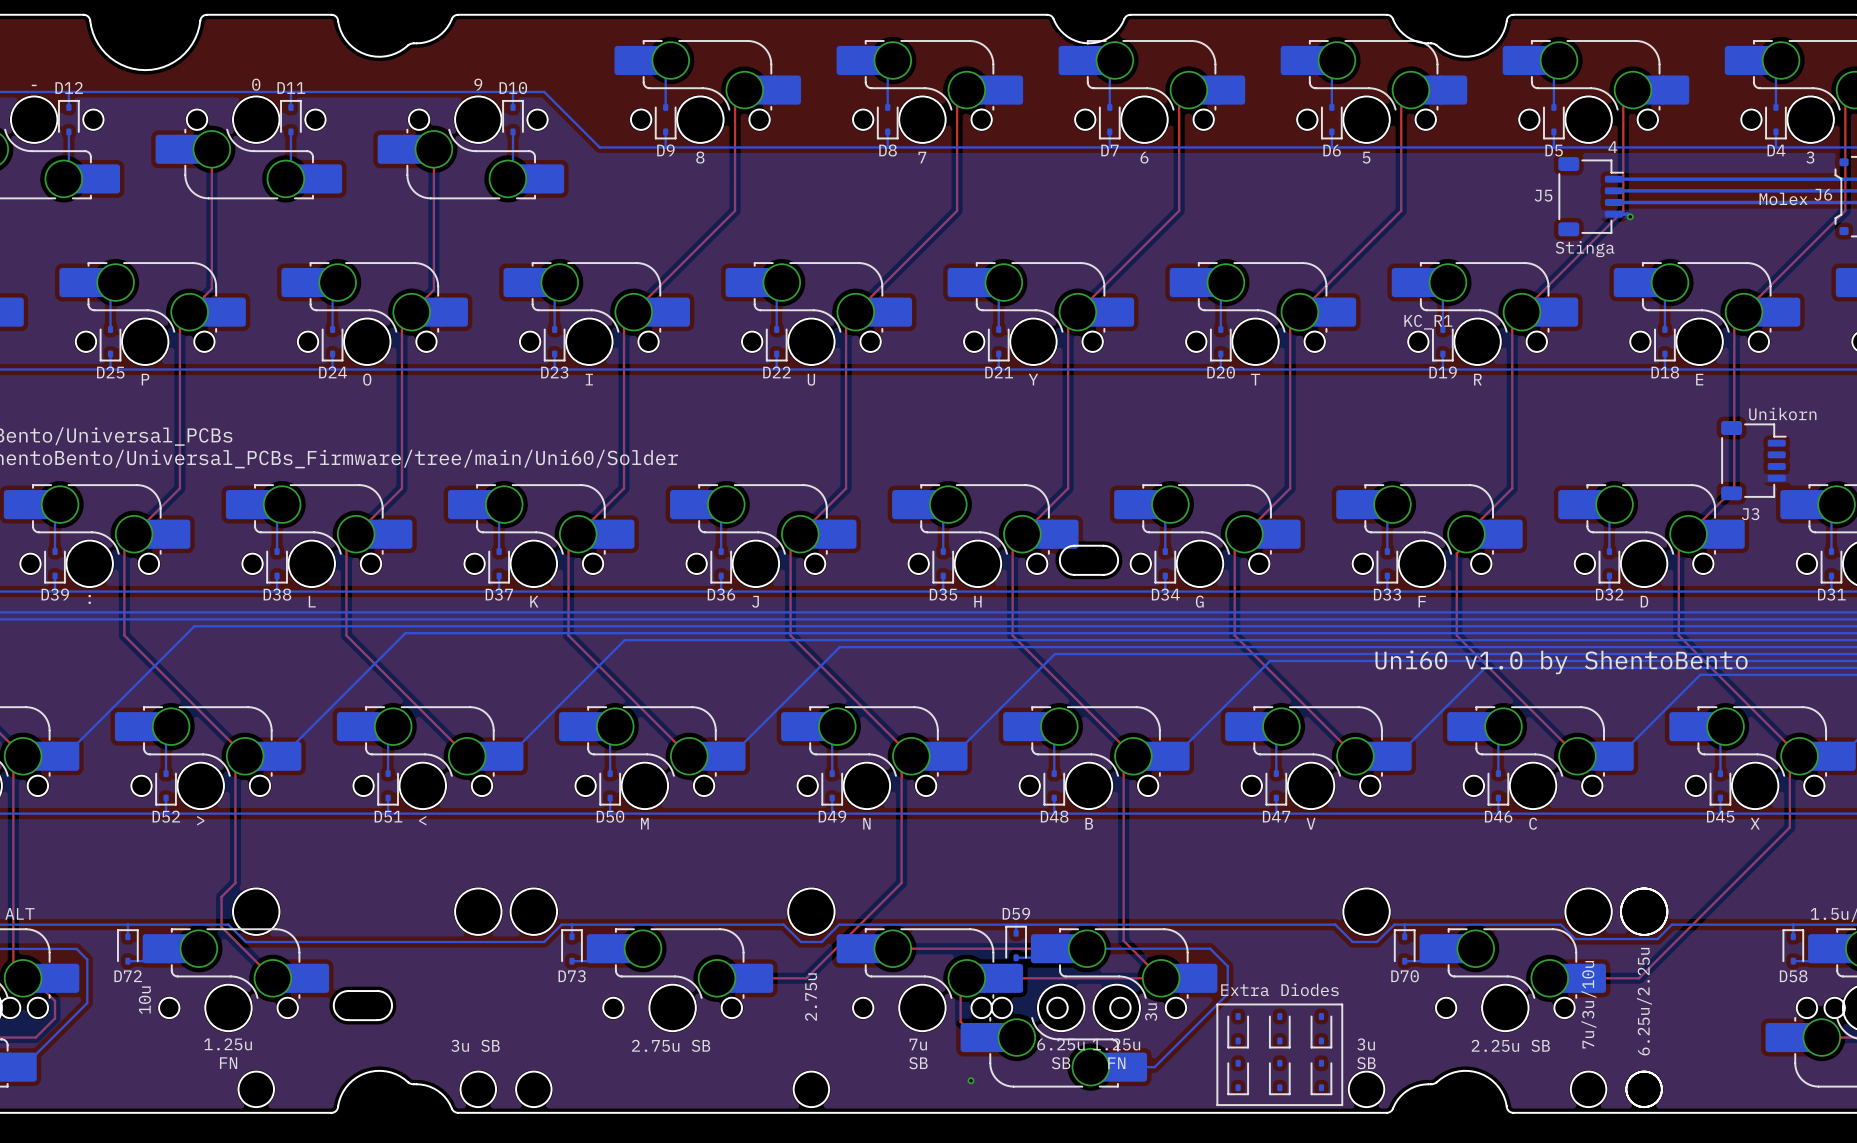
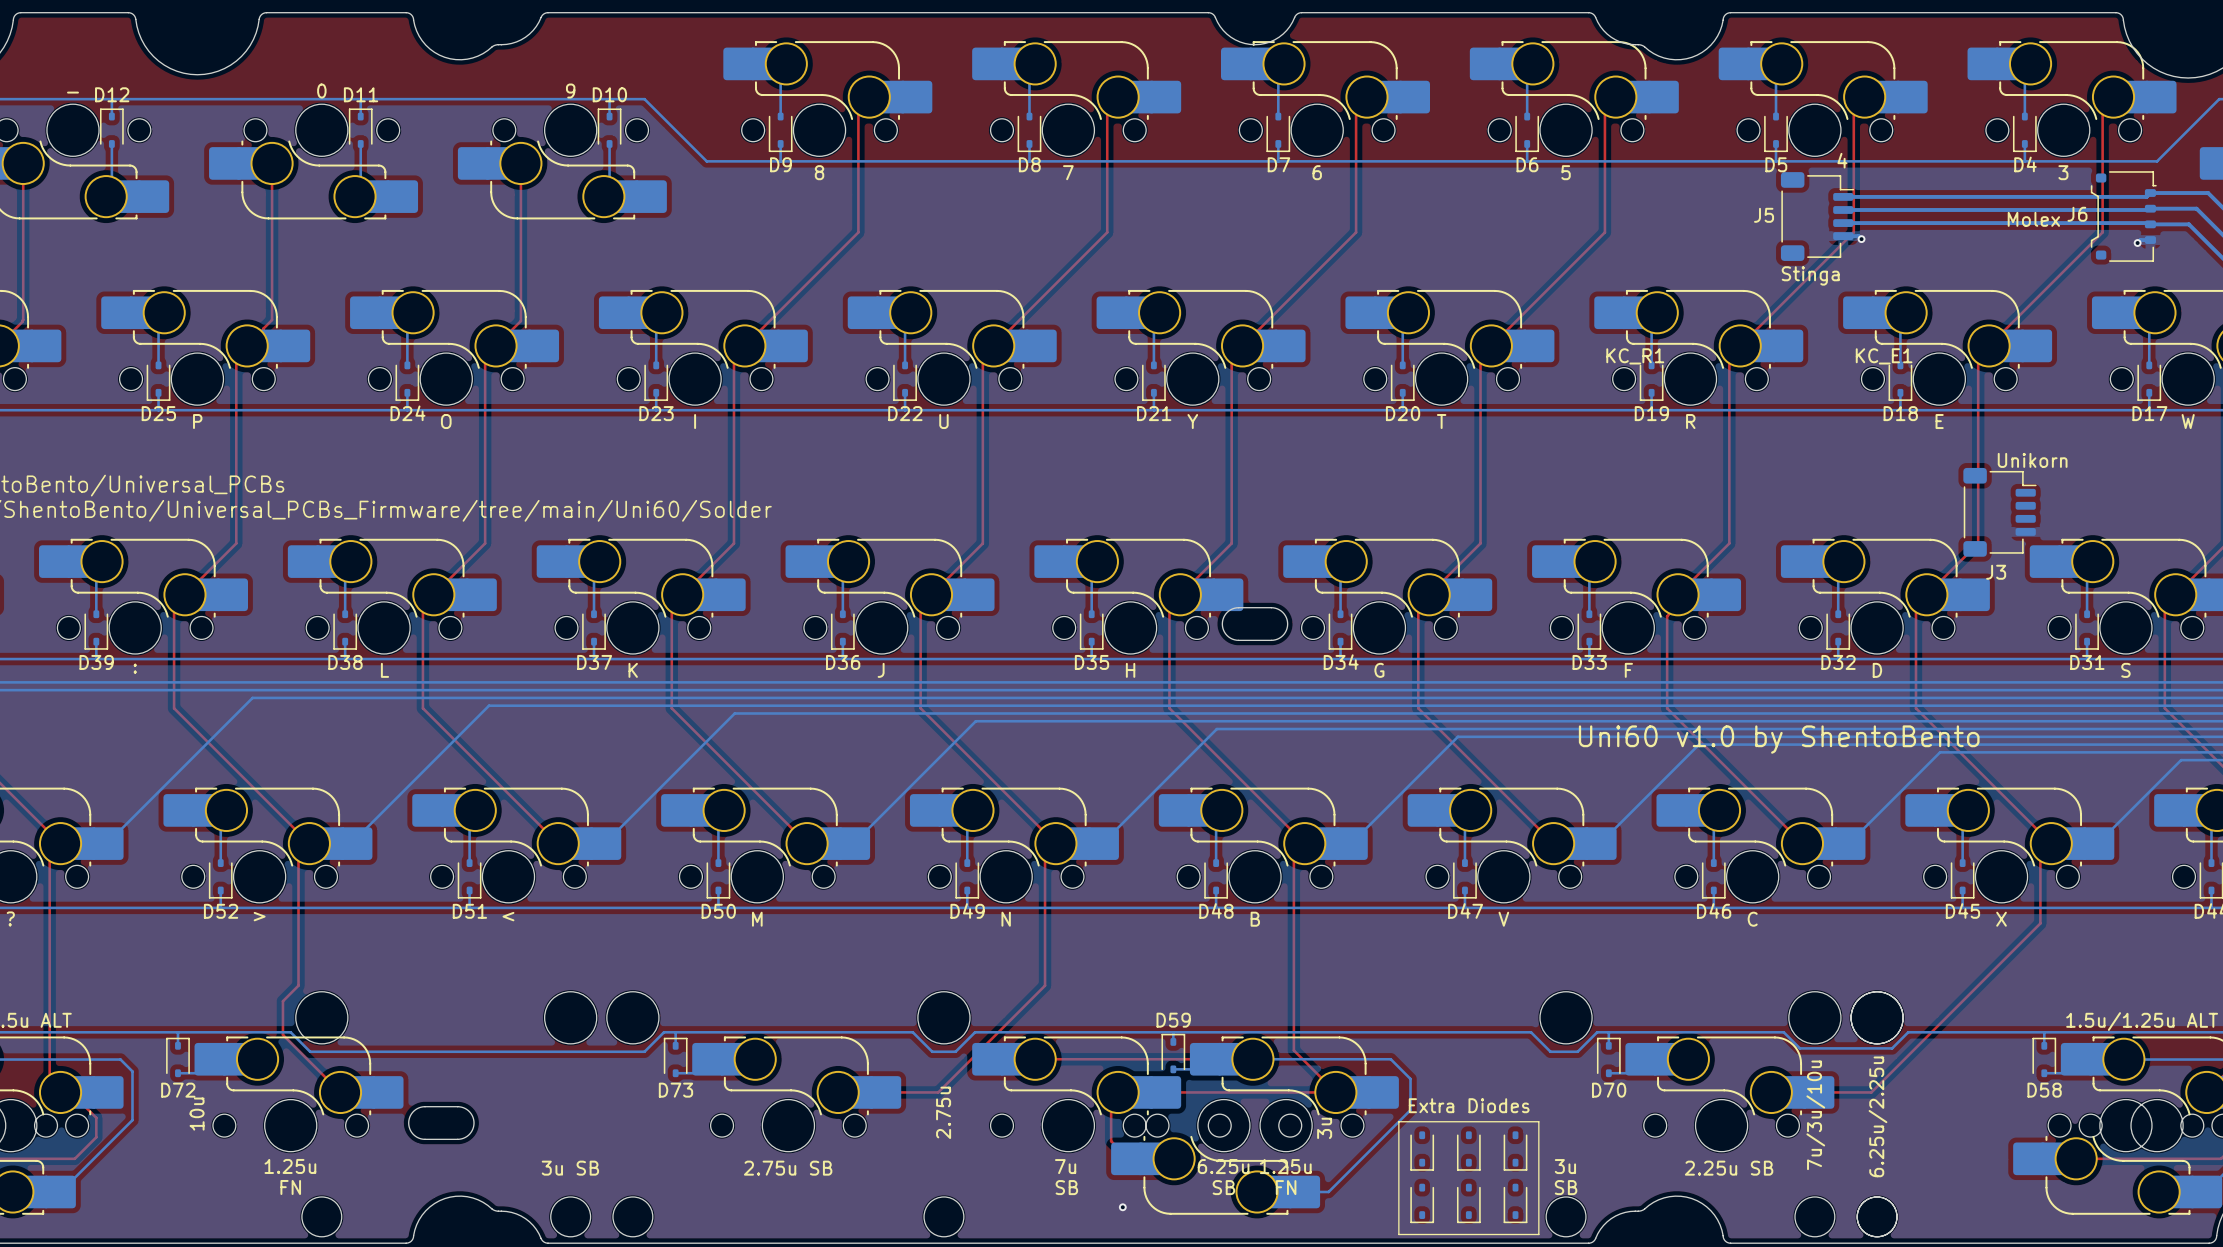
KC_E1 name: none -> KC_E1 (1884, 356)

